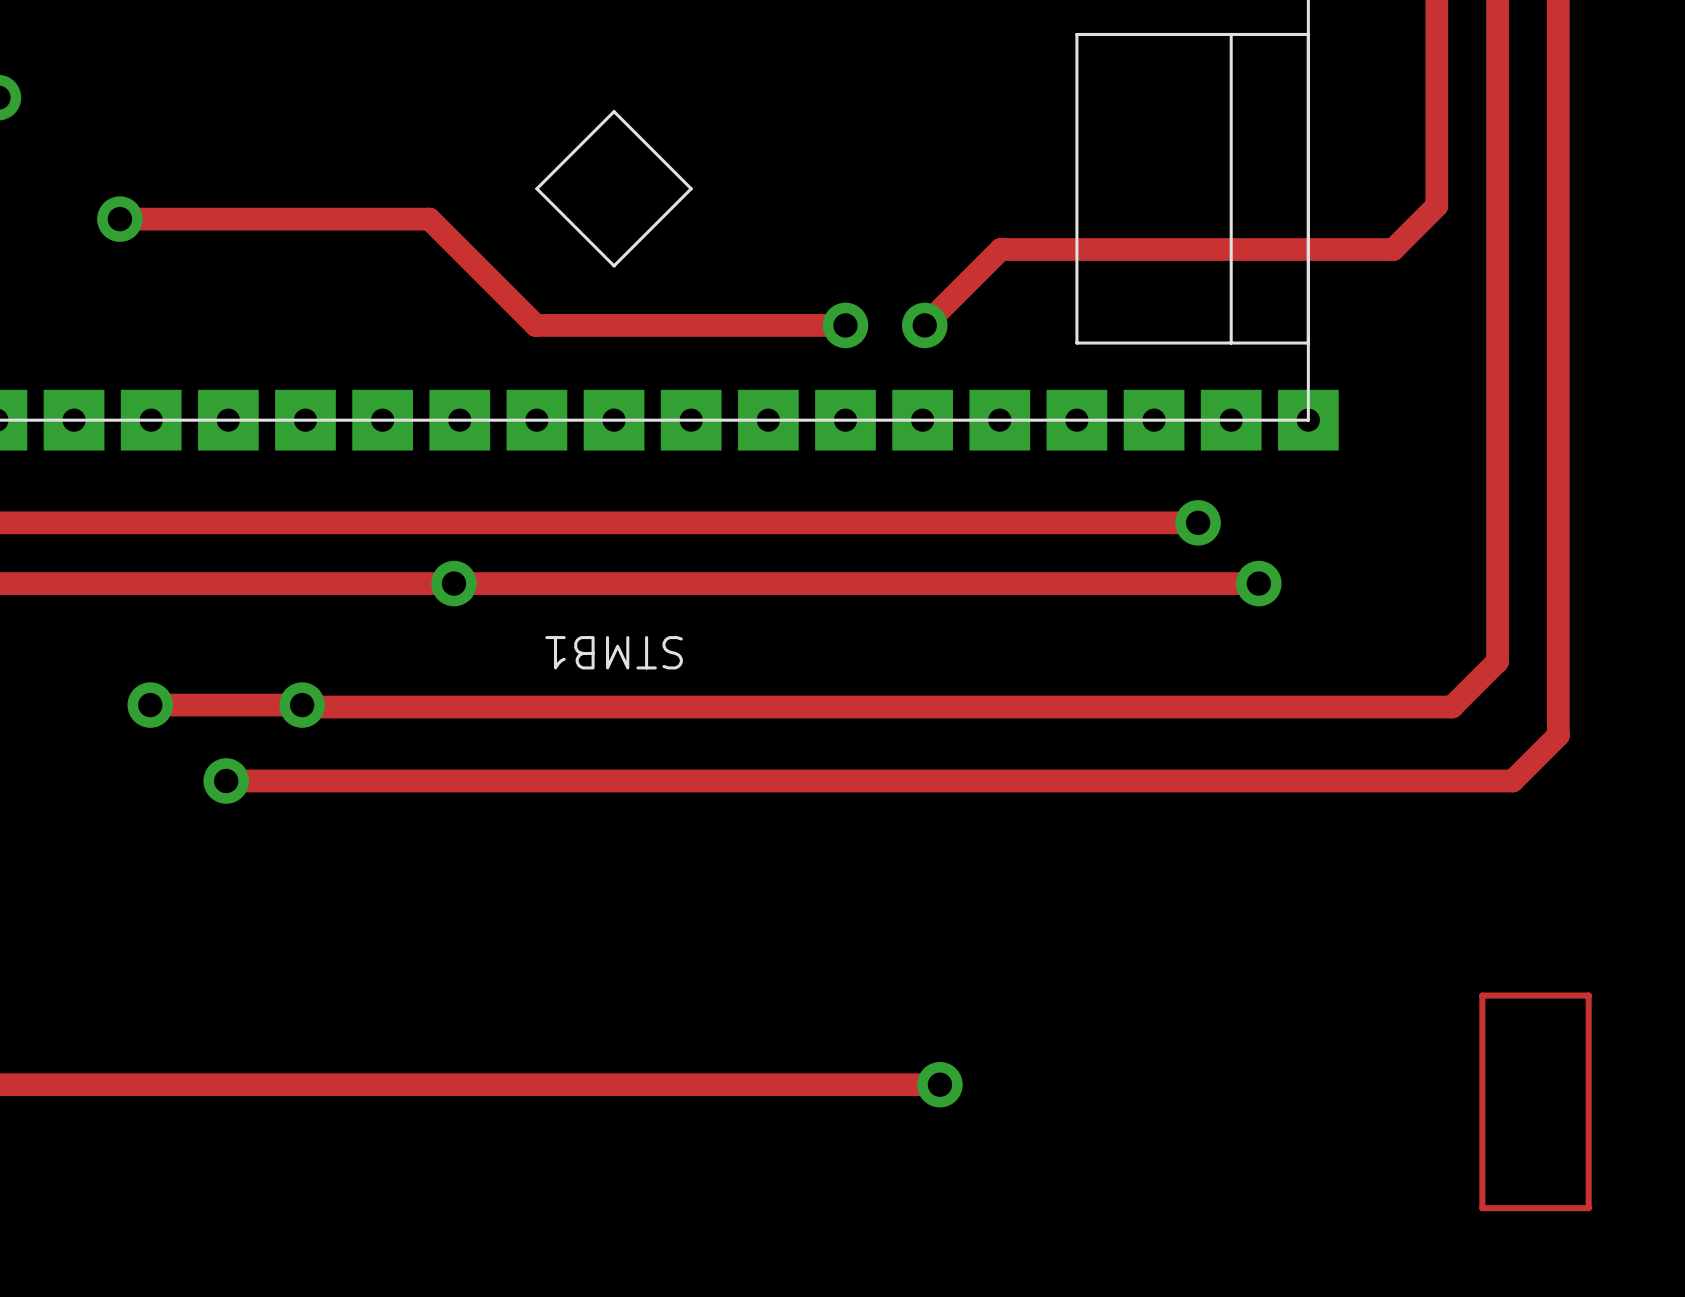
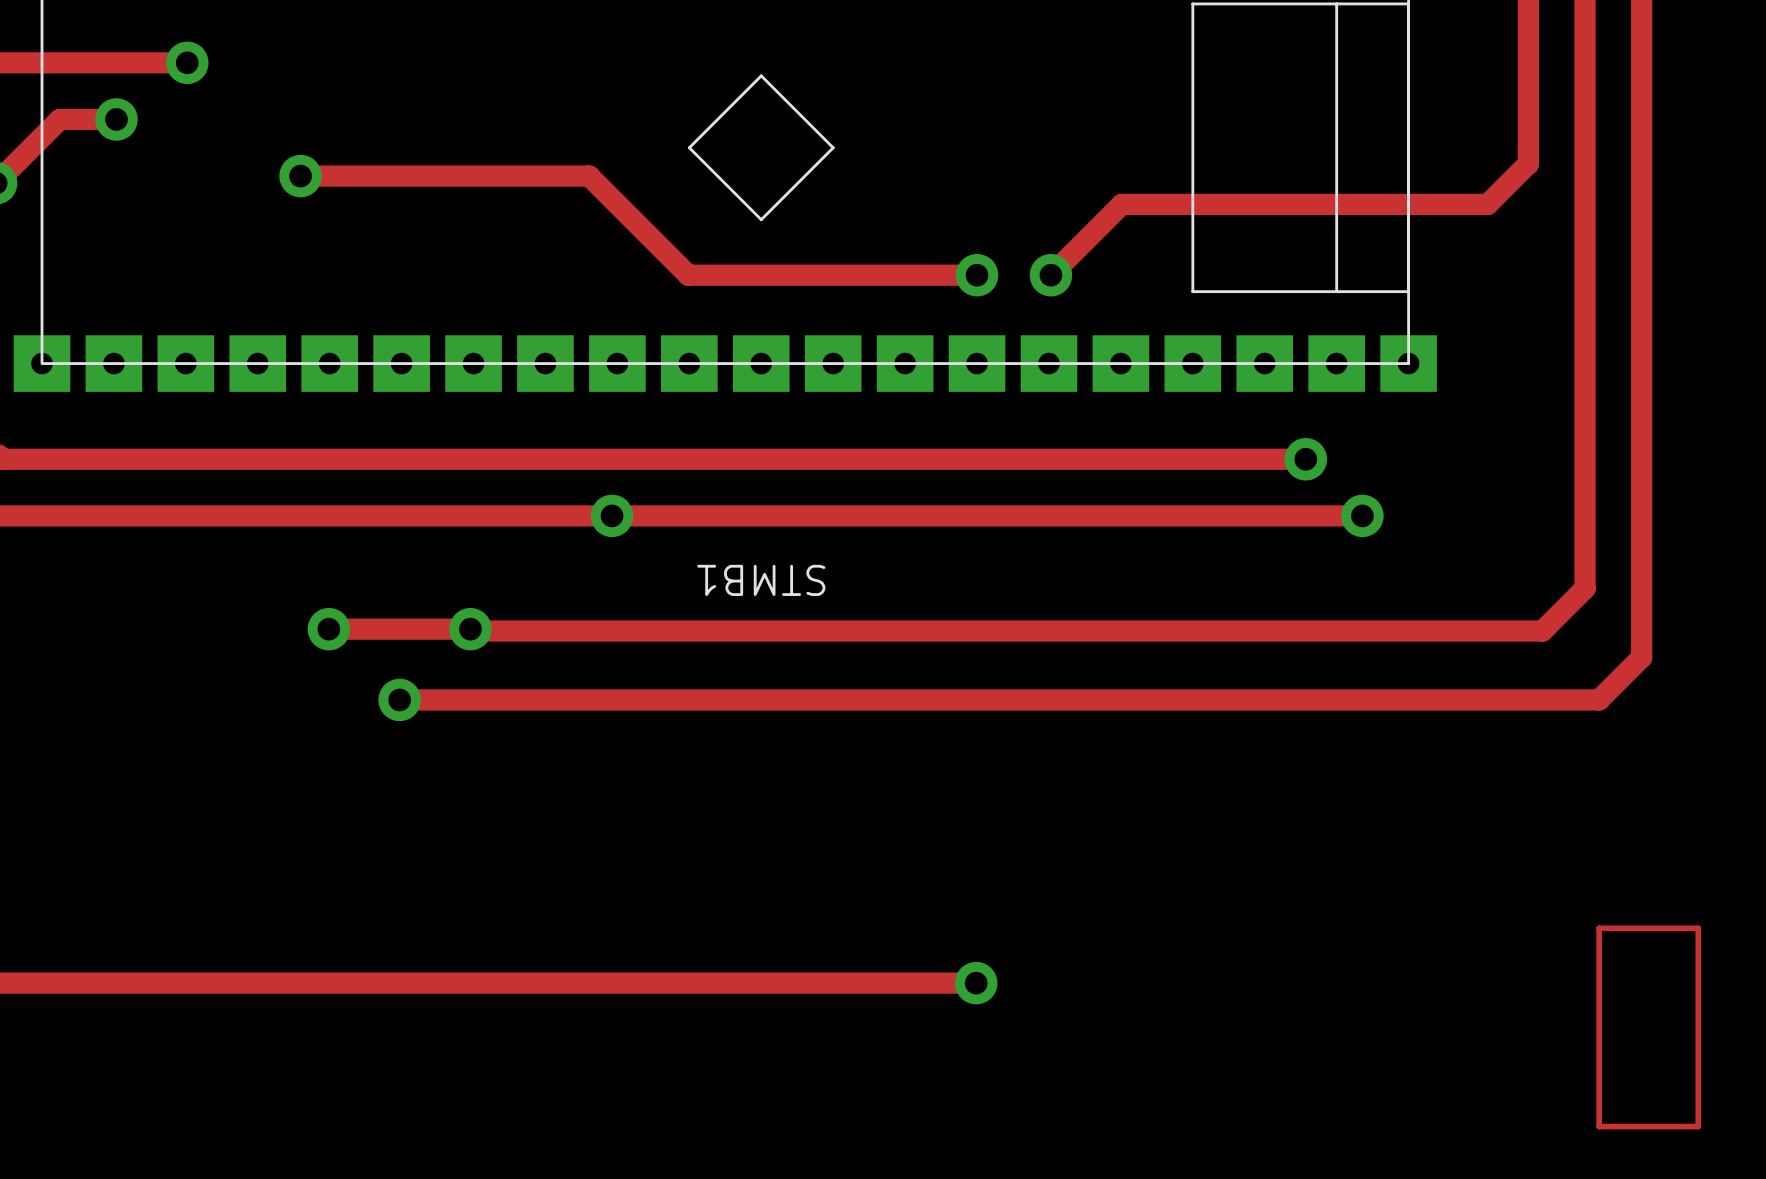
track: (1482, 995) (1588, 995) (1588, 1208) (1482, 1208) (1482, 995) -> (1599, 928) (1698, 928) (1698, 1126) (1599, 1126) (1599, 928)
track: (844, 1084) (939, 1084) -> none
via position: (939, 1084) -> (976, 983)

